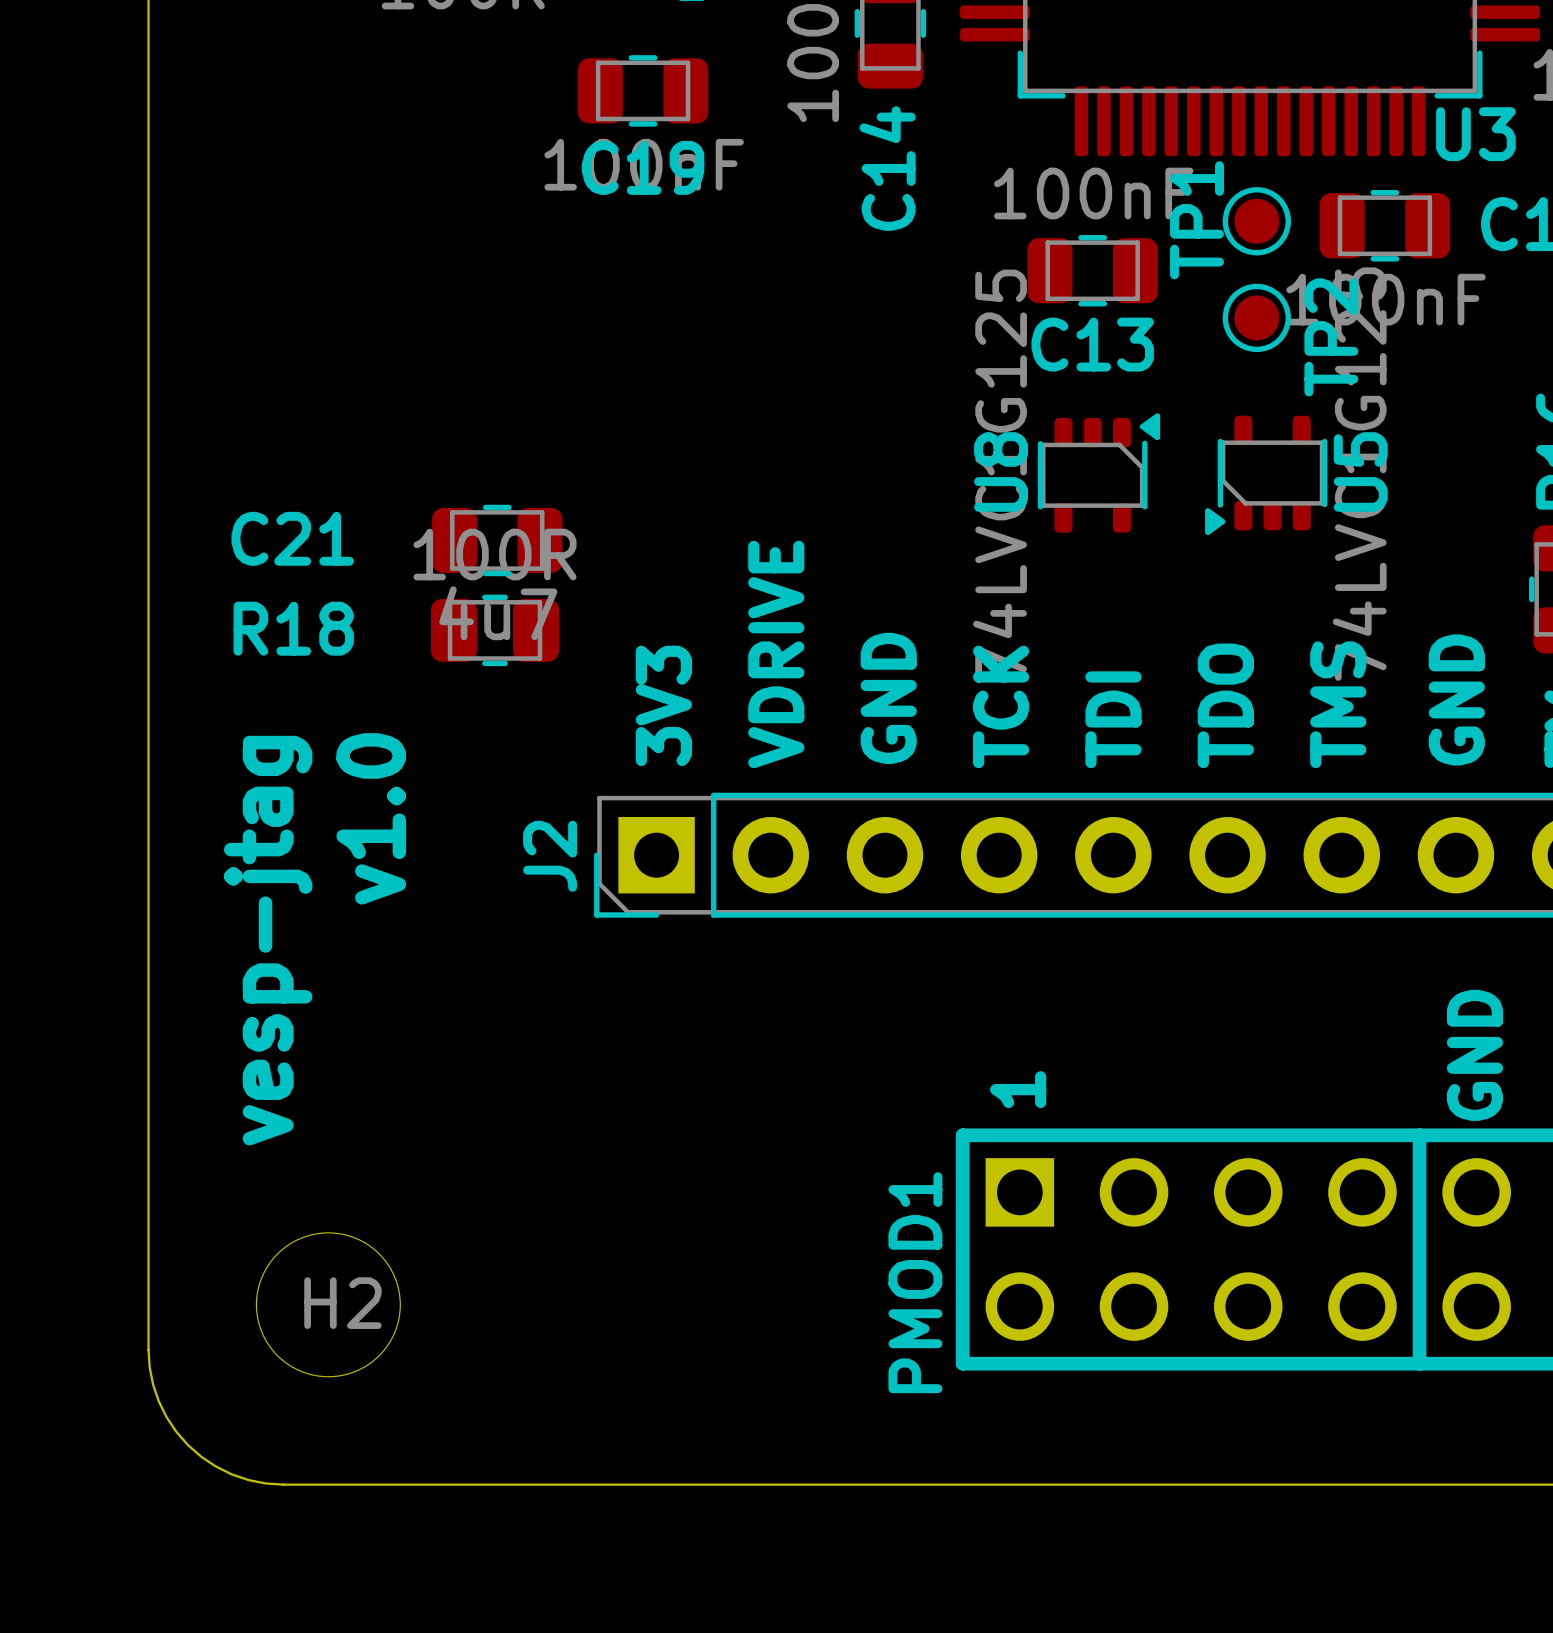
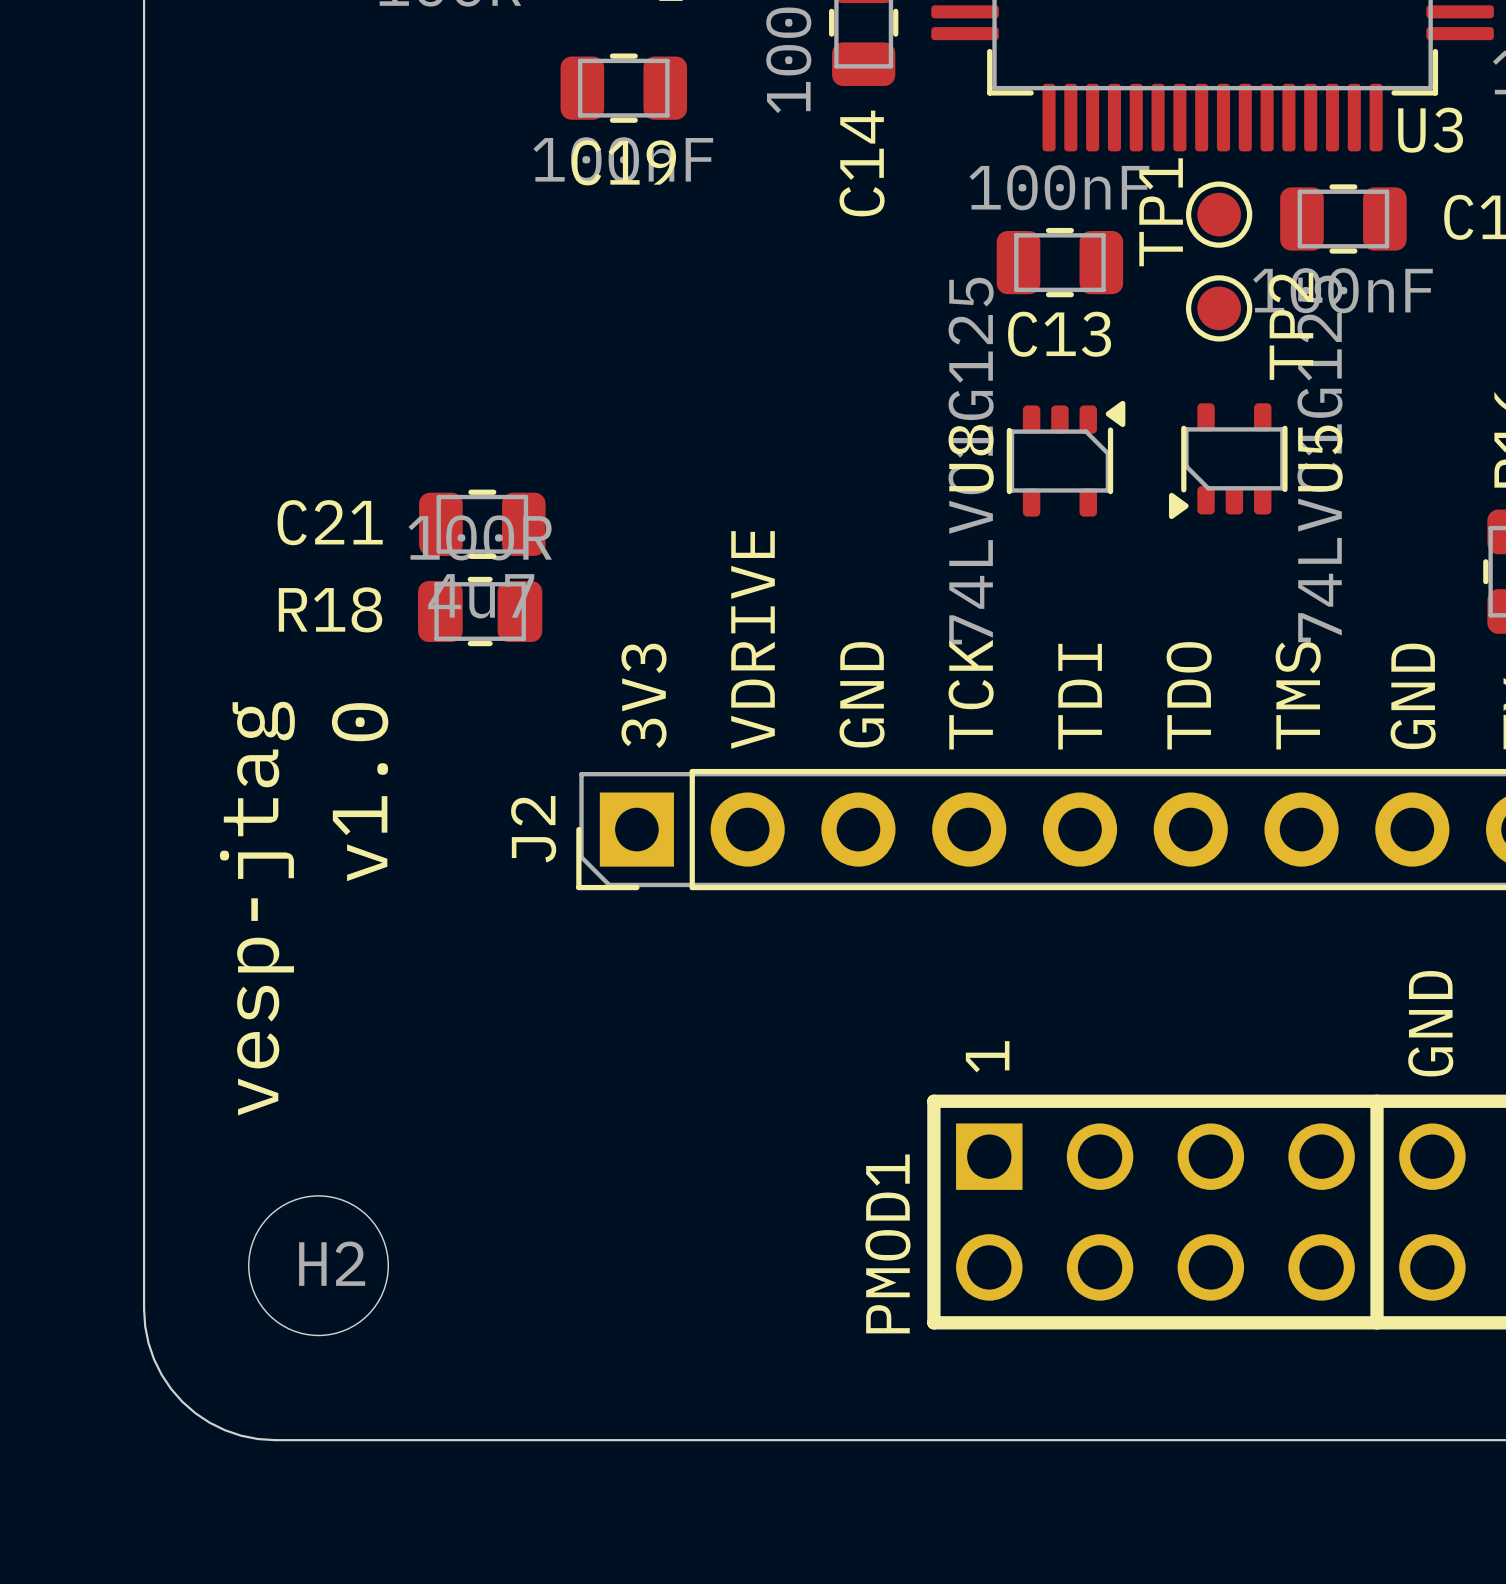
C21 name position: C21 (292, 538) -> C21 (330, 522)
R18 name position: R18 (293, 628) -> R18 (330, 609)

